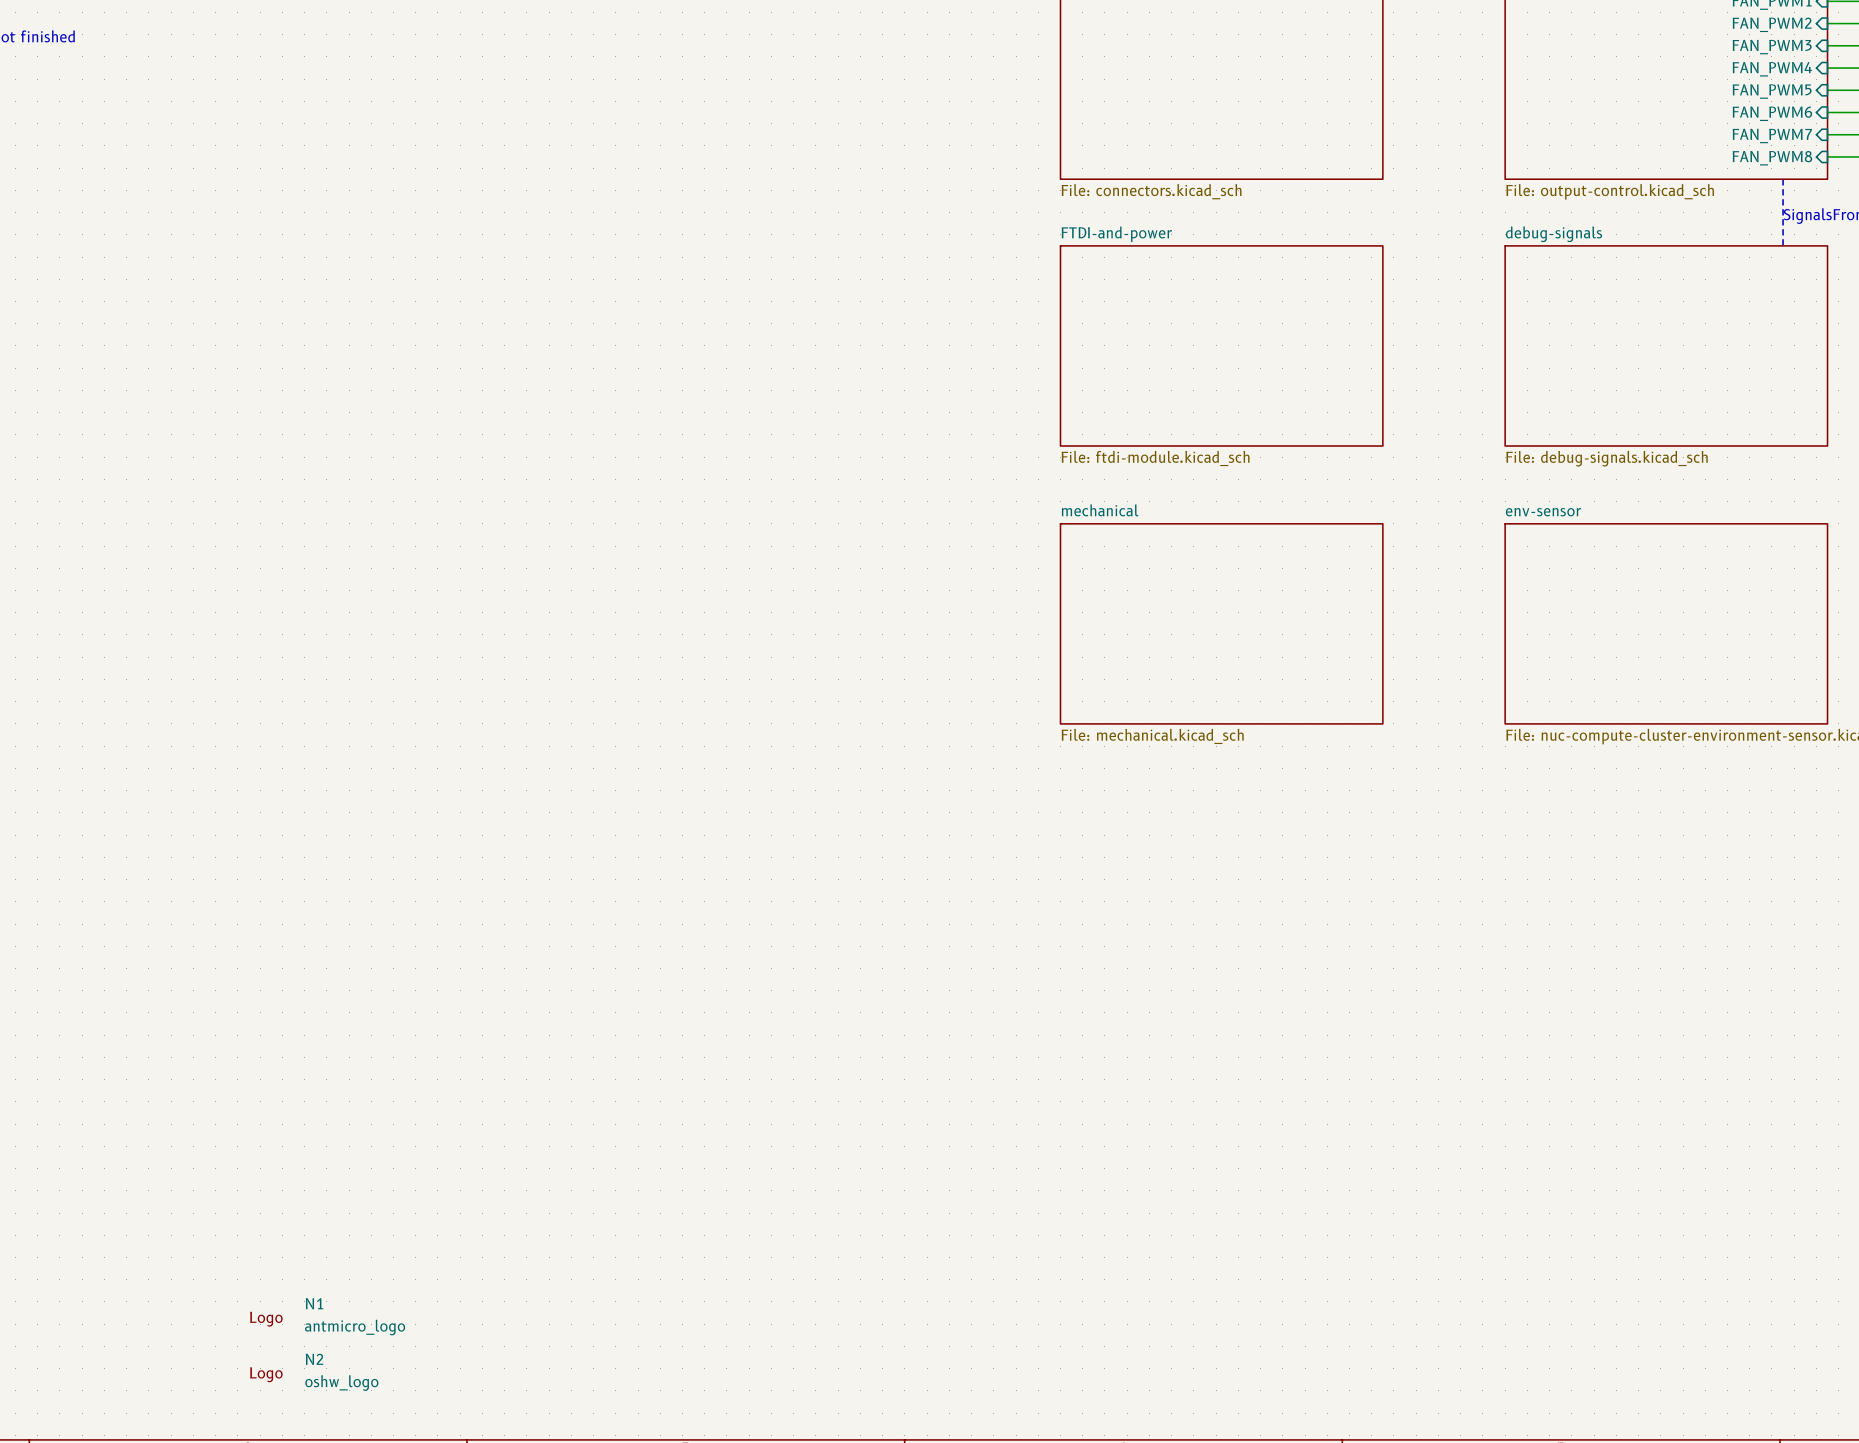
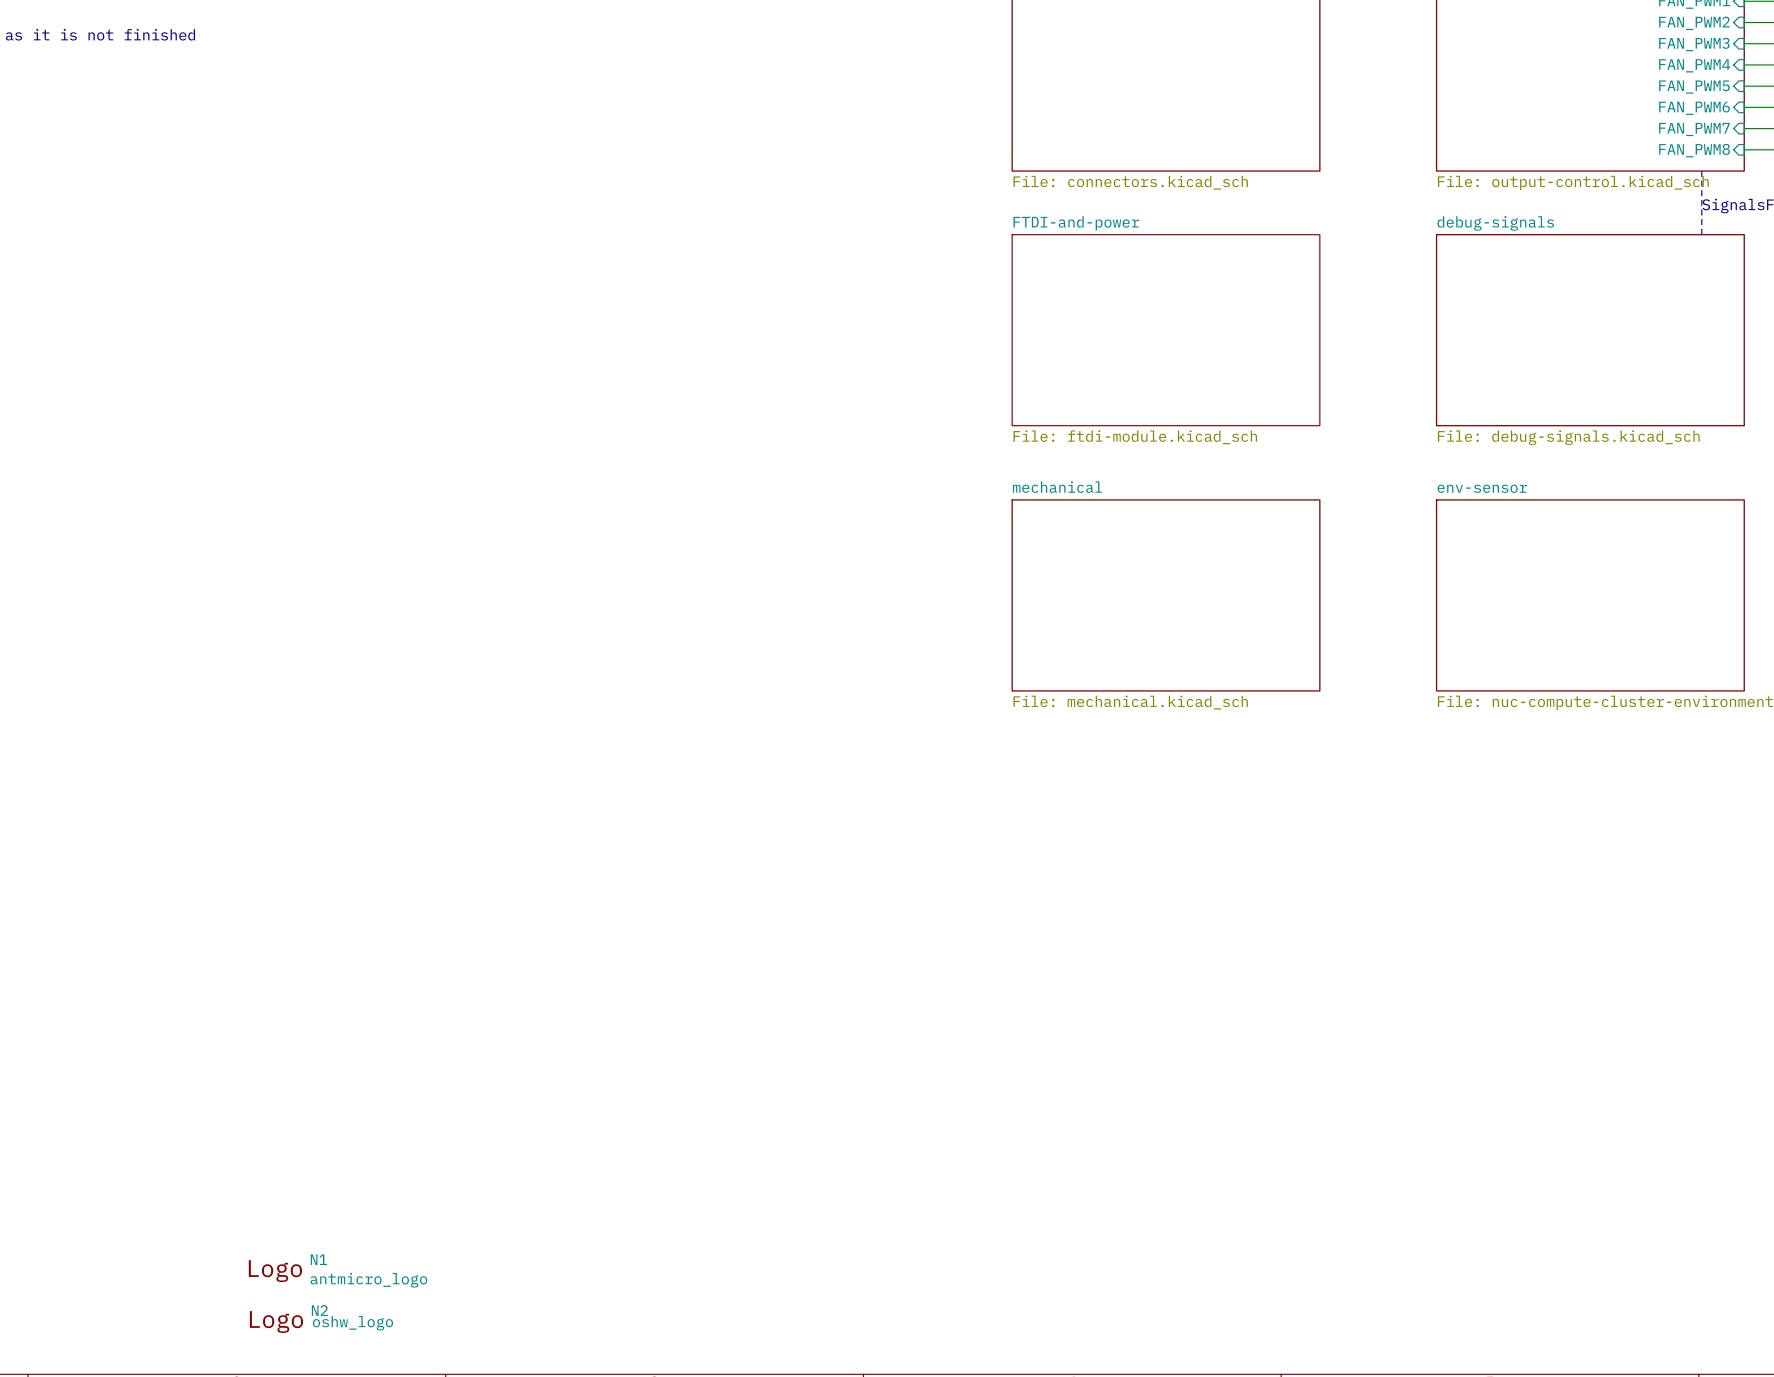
N1 symbol: [250, 1298, 406, 1336] -> [248, 1254, 428, 1288]
N2 symbol: [250, 1353, 379, 1391] -> [249, 1305, 393, 1333]

